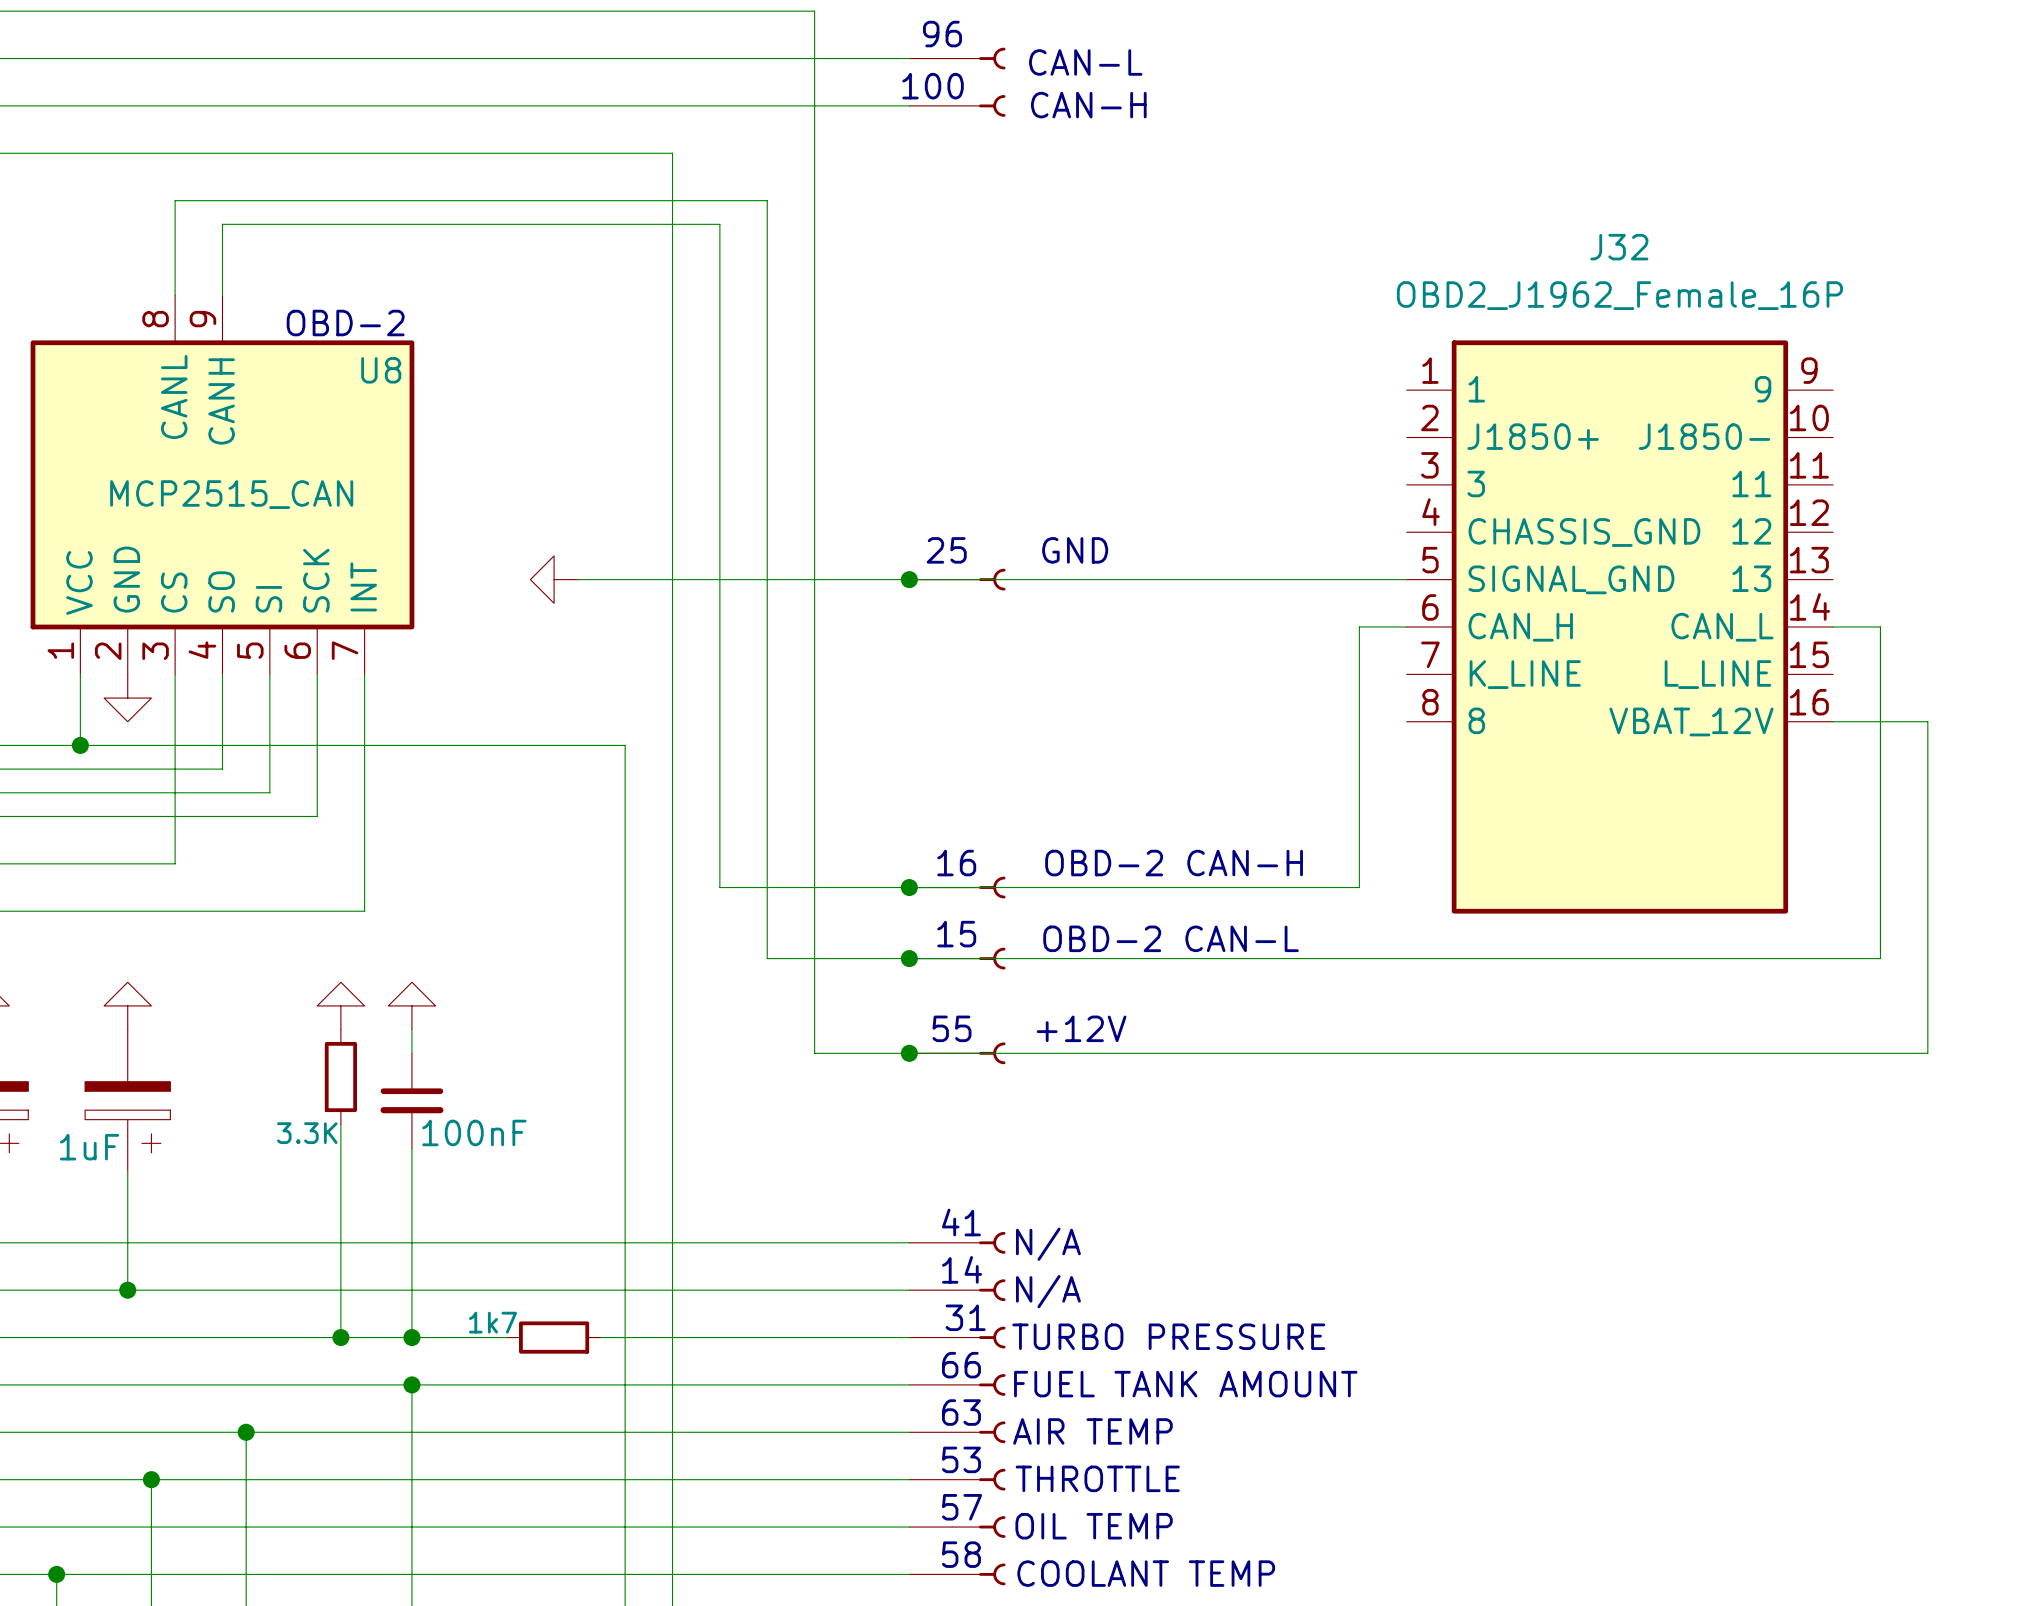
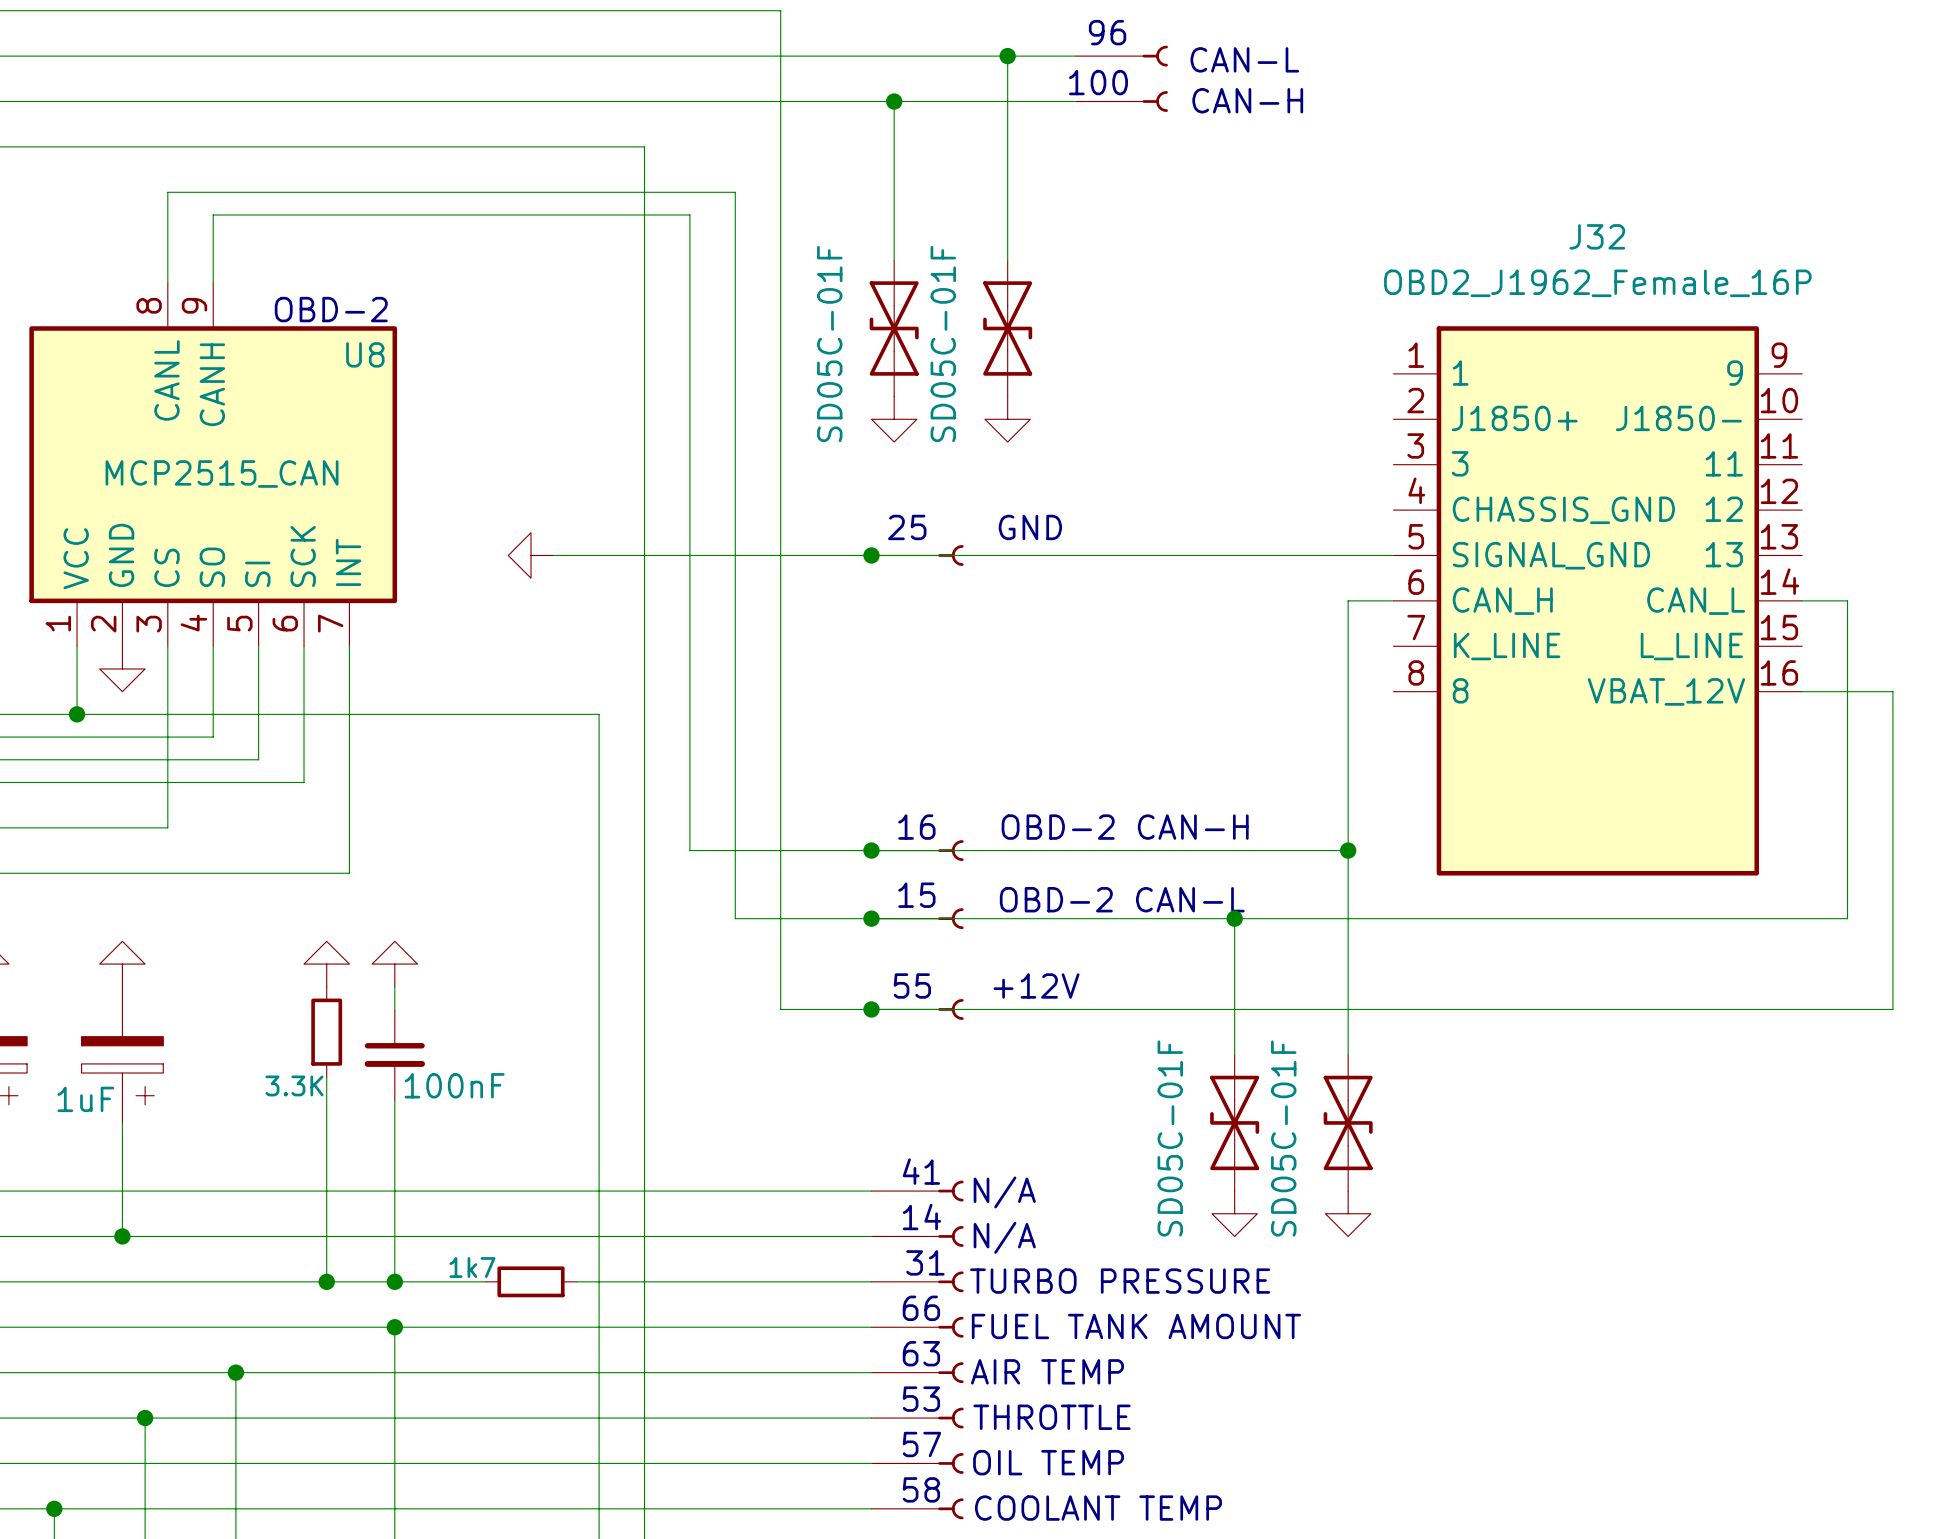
text position: 96 (942, 34) -> 96 (1107, 32)
wire: none -> (871, 56) (1075, 56)
part: (957, 58) -> none
wire: none -> (1007, 56) (1007, 260)
junction: none -> (1007, 56)
part: none -> (1121, 56)
text position: CAN-L (1085, 62) -> CAN-L (1244, 59)
text position: 100 (933, 86) -> 100 (1098, 82)
wire: none -> (871, 101) (1075, 101)
wire: none -> (894, 101) (894, 260)
junction: none -> (894, 101)
part: (957, 105) -> none
text position: CAN-H (1088, 105) -> CAN-H (1247, 100)
part: none -> (1121, 101)
part: none -> SD05C-01F (894, 328)
part: none -> SD05C-01F (1007, 328)
power symbol: none -> (894, 419)
power symbol: none -> (1007, 419)
wire: (1406, 626) (1359, 626) (1359, 887) -> (1348, 850) (1302, 850)
wire: none -> (1393, 600) (1348, 600) (1348, 1054)
J32 position: (1619, 626) -> (1597, 600)
wire: (1833, 626) (1880, 626) (1880, 958) -> none
wire: none -> (1802, 600) (1847, 600) (1847, 691) (1892, 691) (1892, 1009) (1847, 1009)
junction: none -> (1348, 850)
wire: none -> (1234, 918) (1234, 1054)
junction: none -> (1234, 918)
wire: (1927, 958) (1927, 1053) -> (1847, 918) (1802, 918)
part: none -> SD05C-01F (1234, 1122)
part: none -> SD05C-01F (1348, 1122)
power symbol: none -> (1234, 1213)
power symbol: none -> (1348, 1213)

